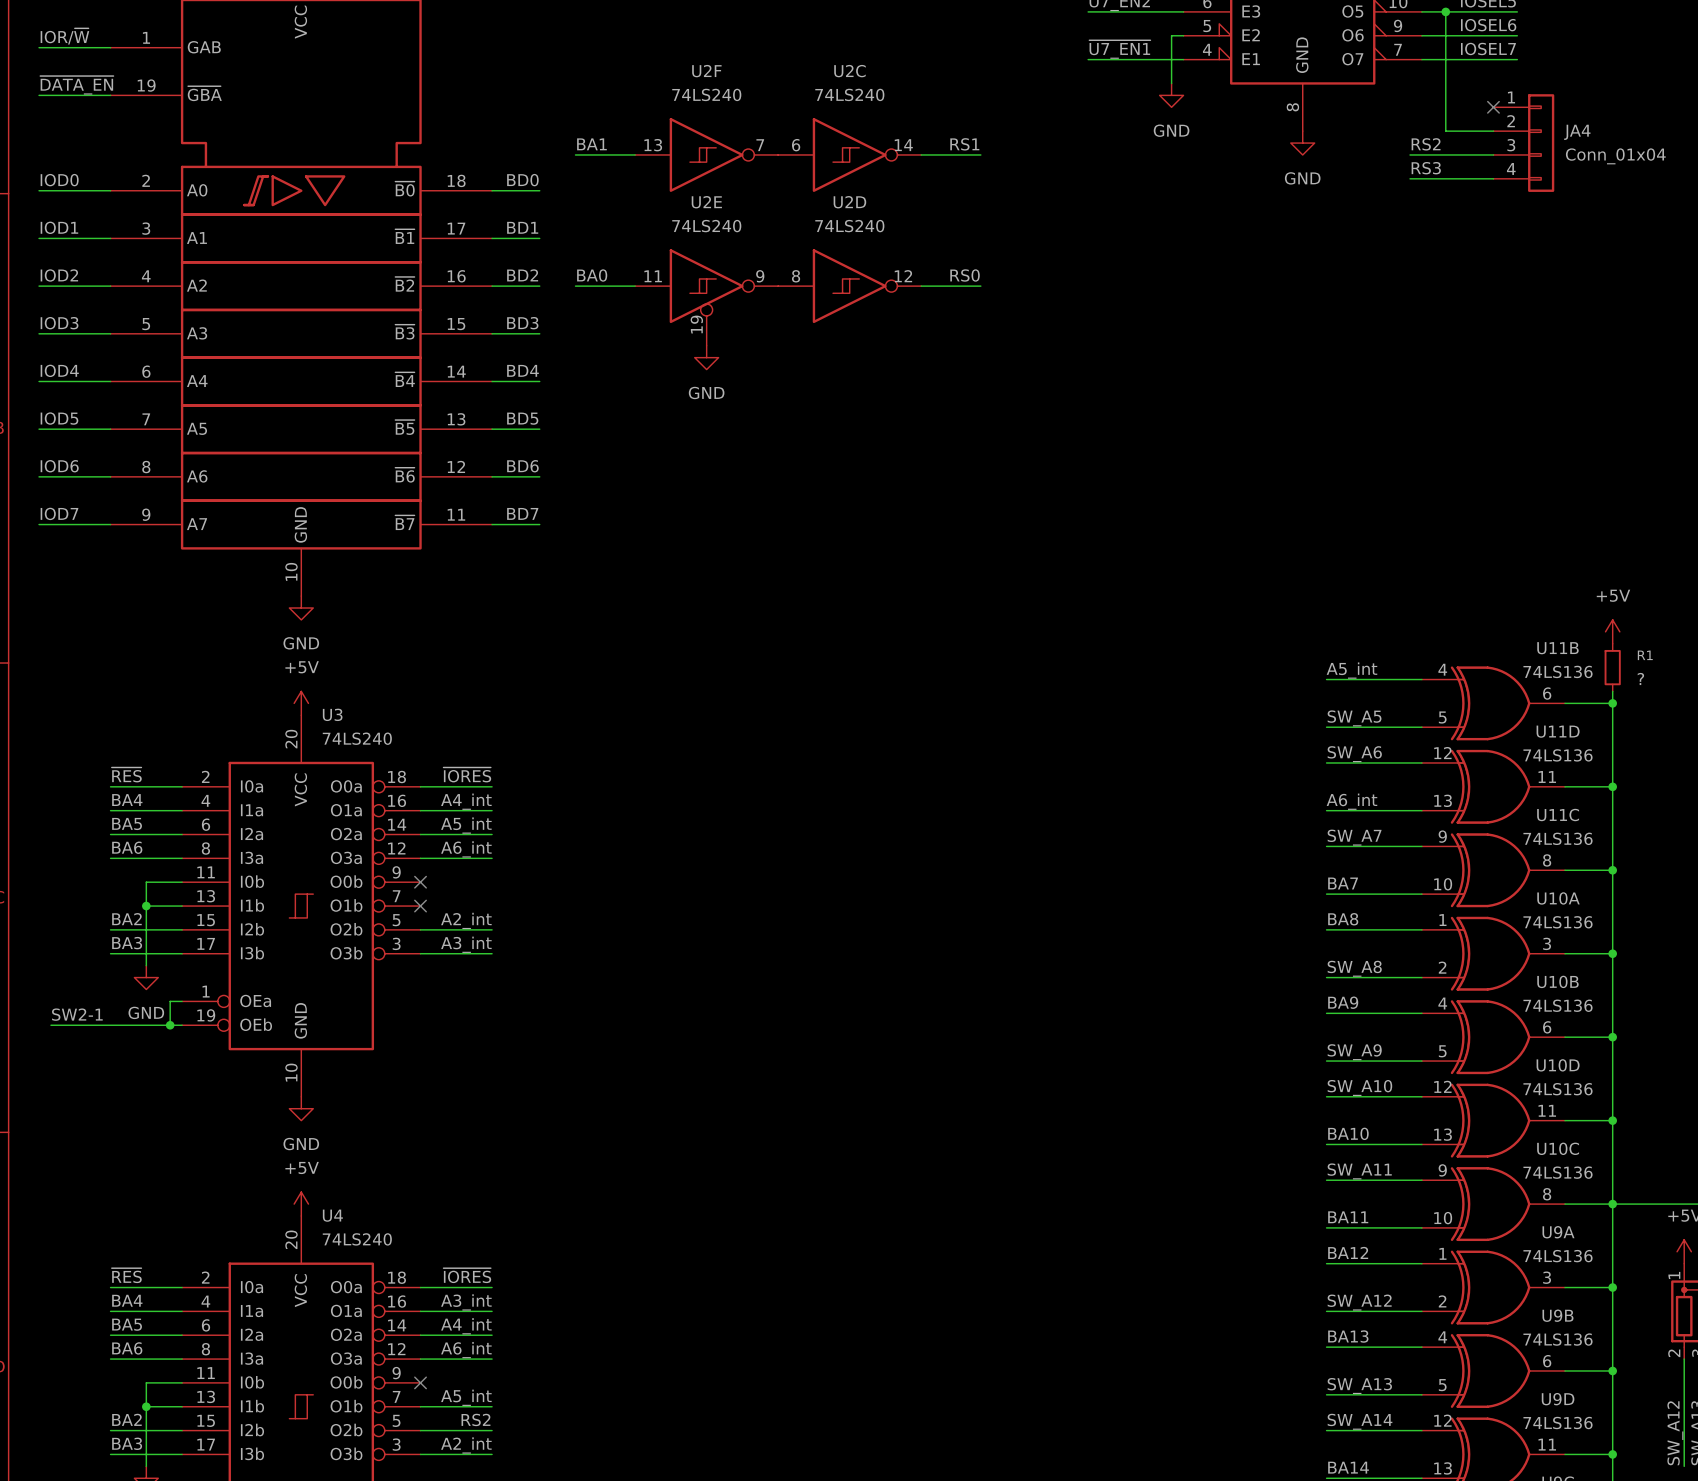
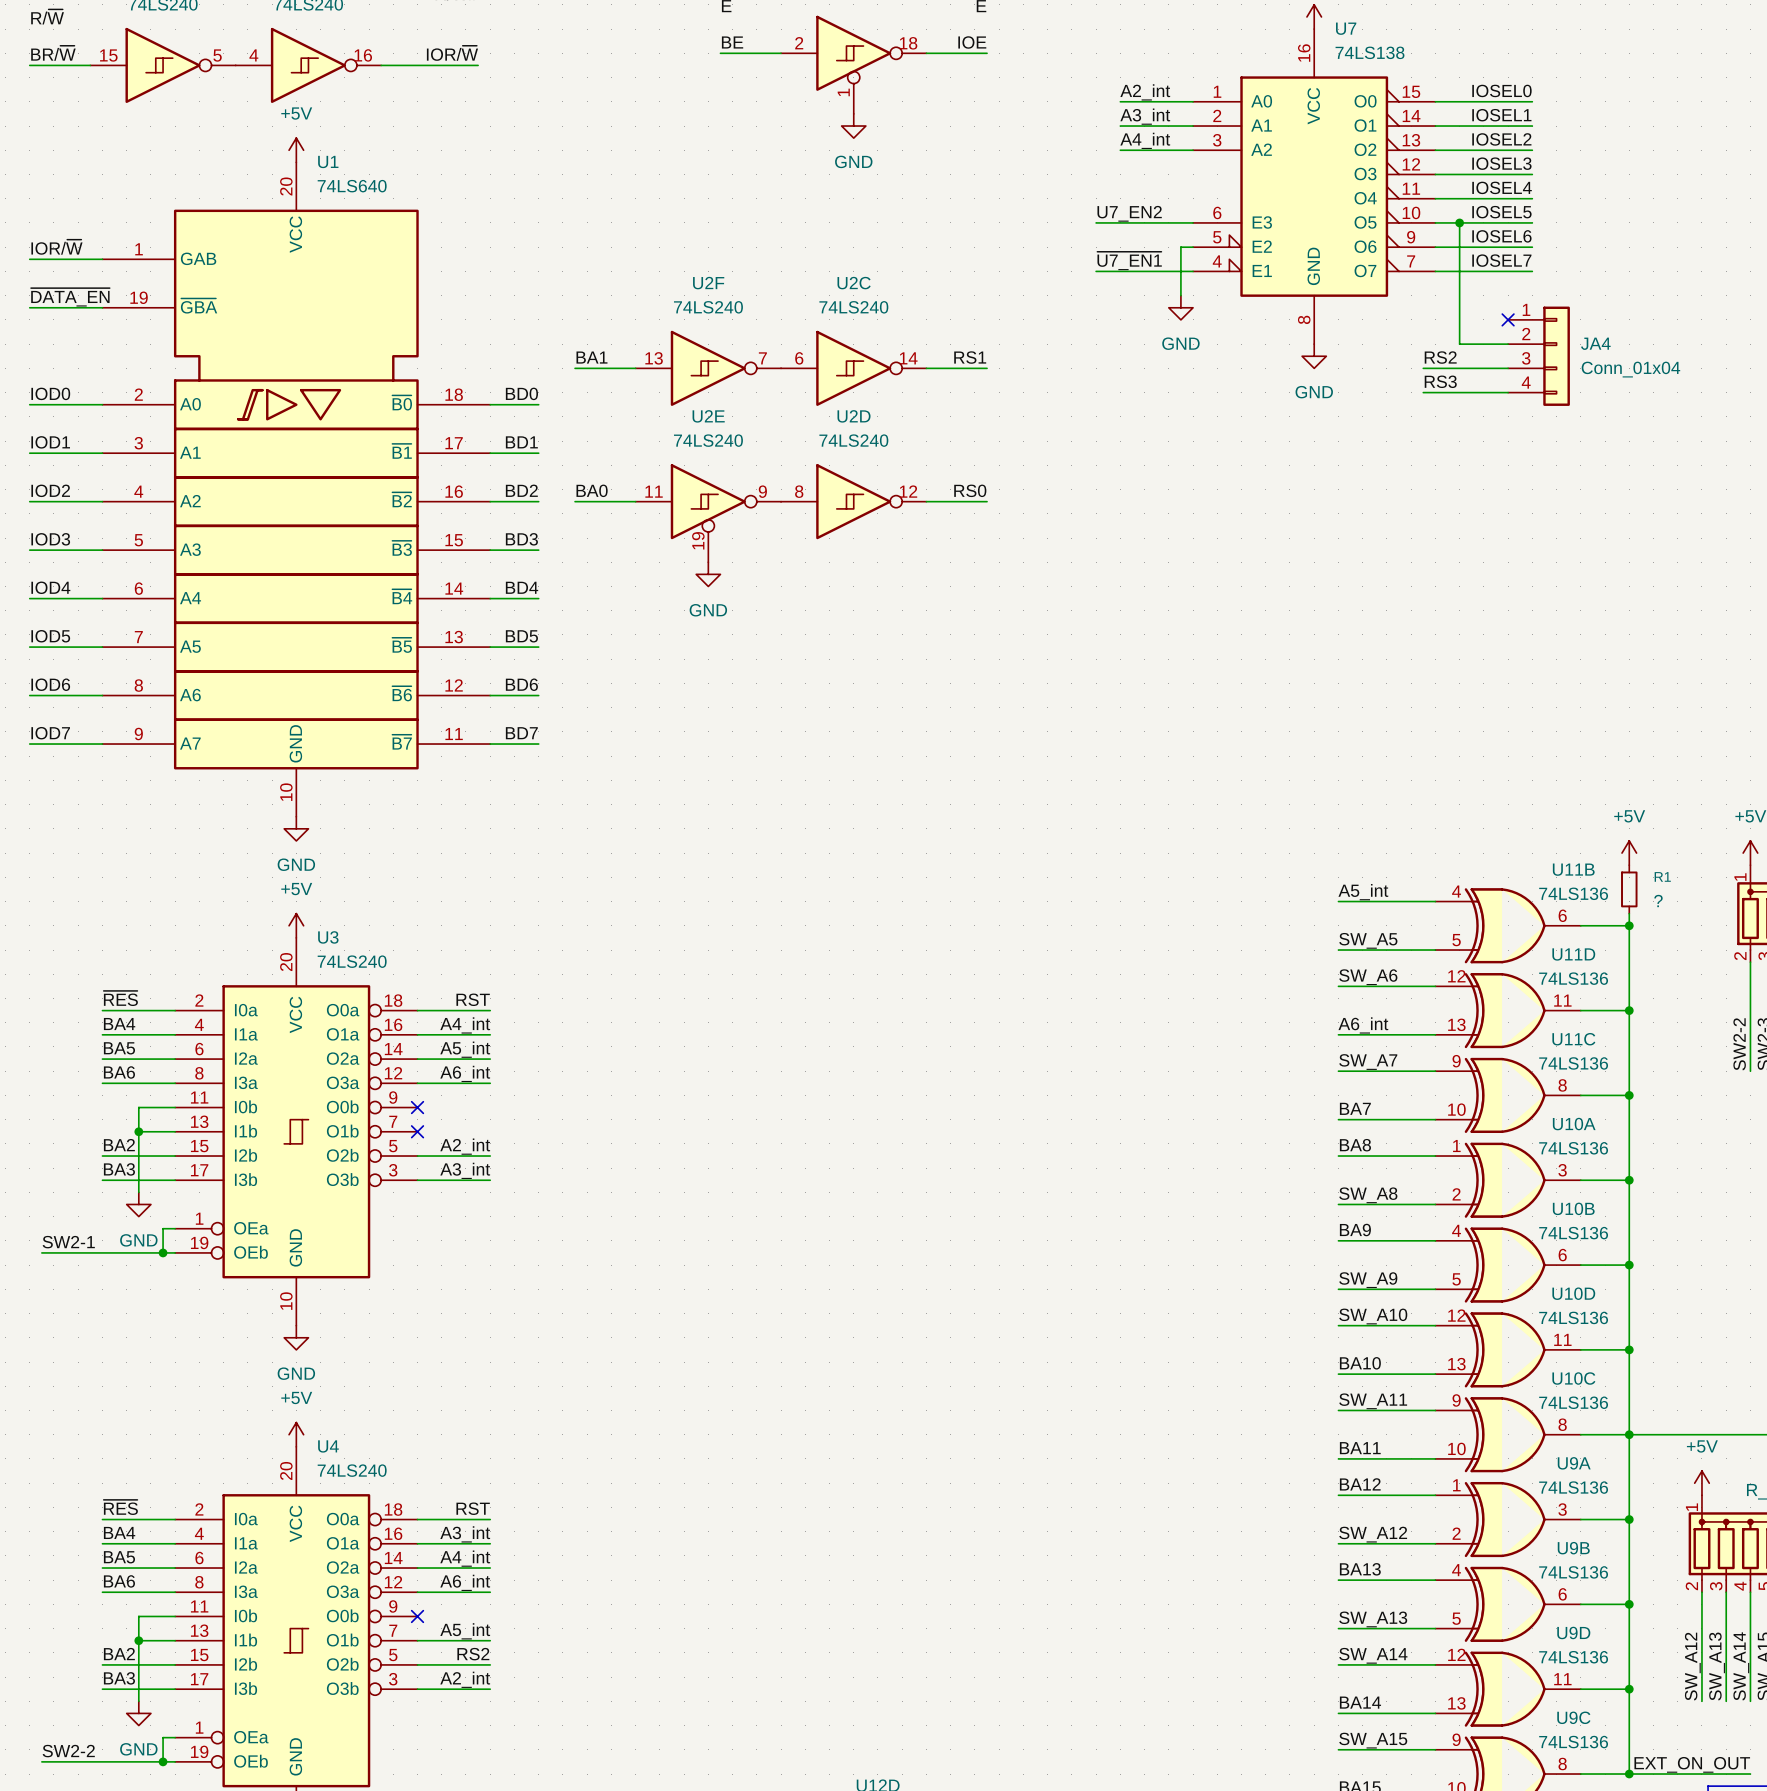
label: ~{IORES} (467, 774) -> RST (473, 999)
label: ~{IORES} (467, 1275) -> RST (473, 1508)

